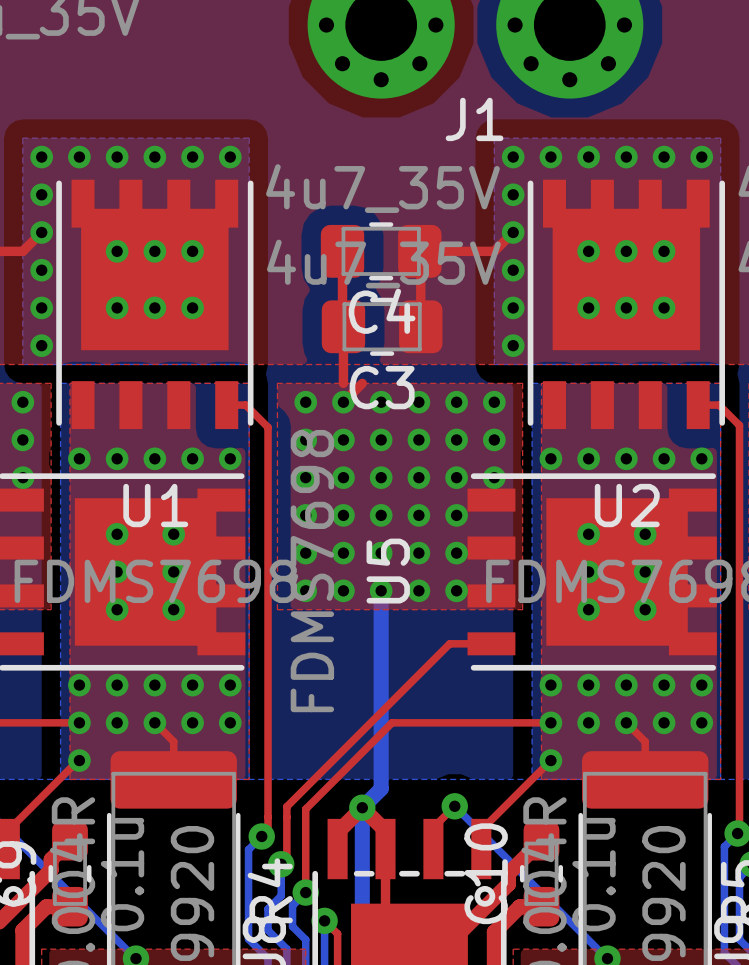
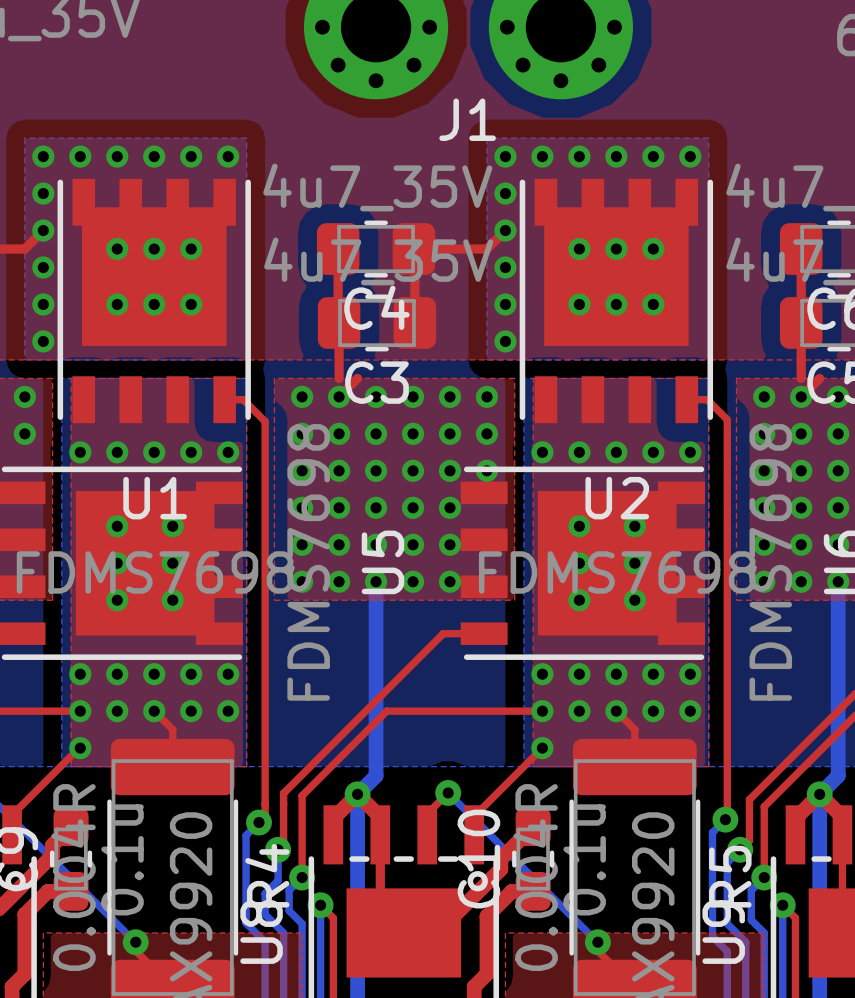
part: (23, 477) -> none

